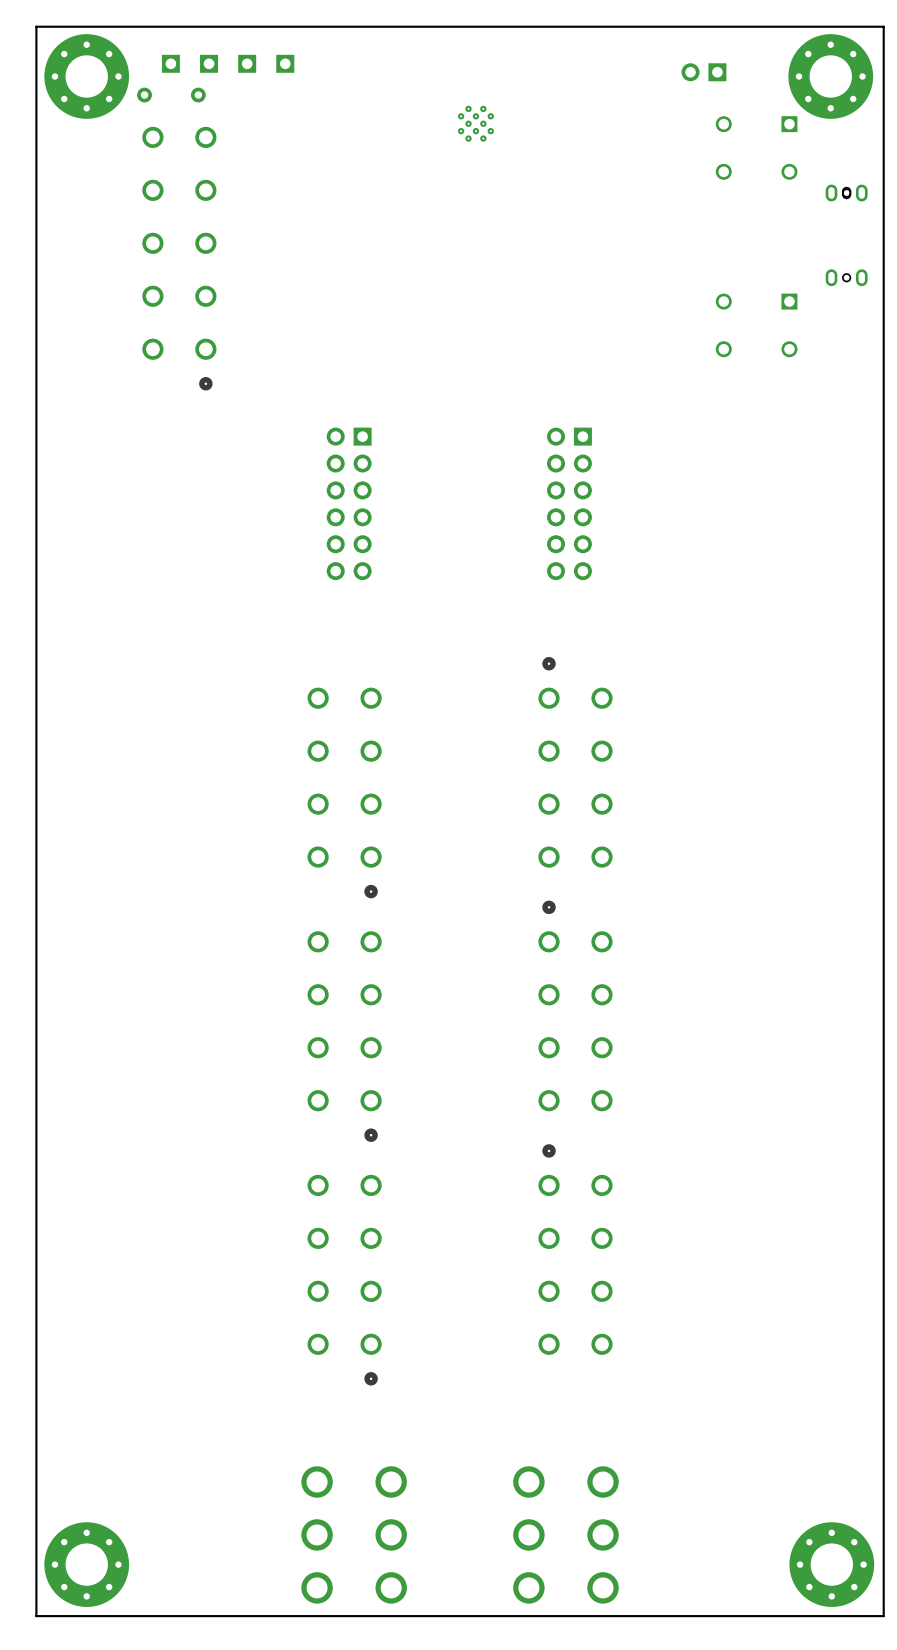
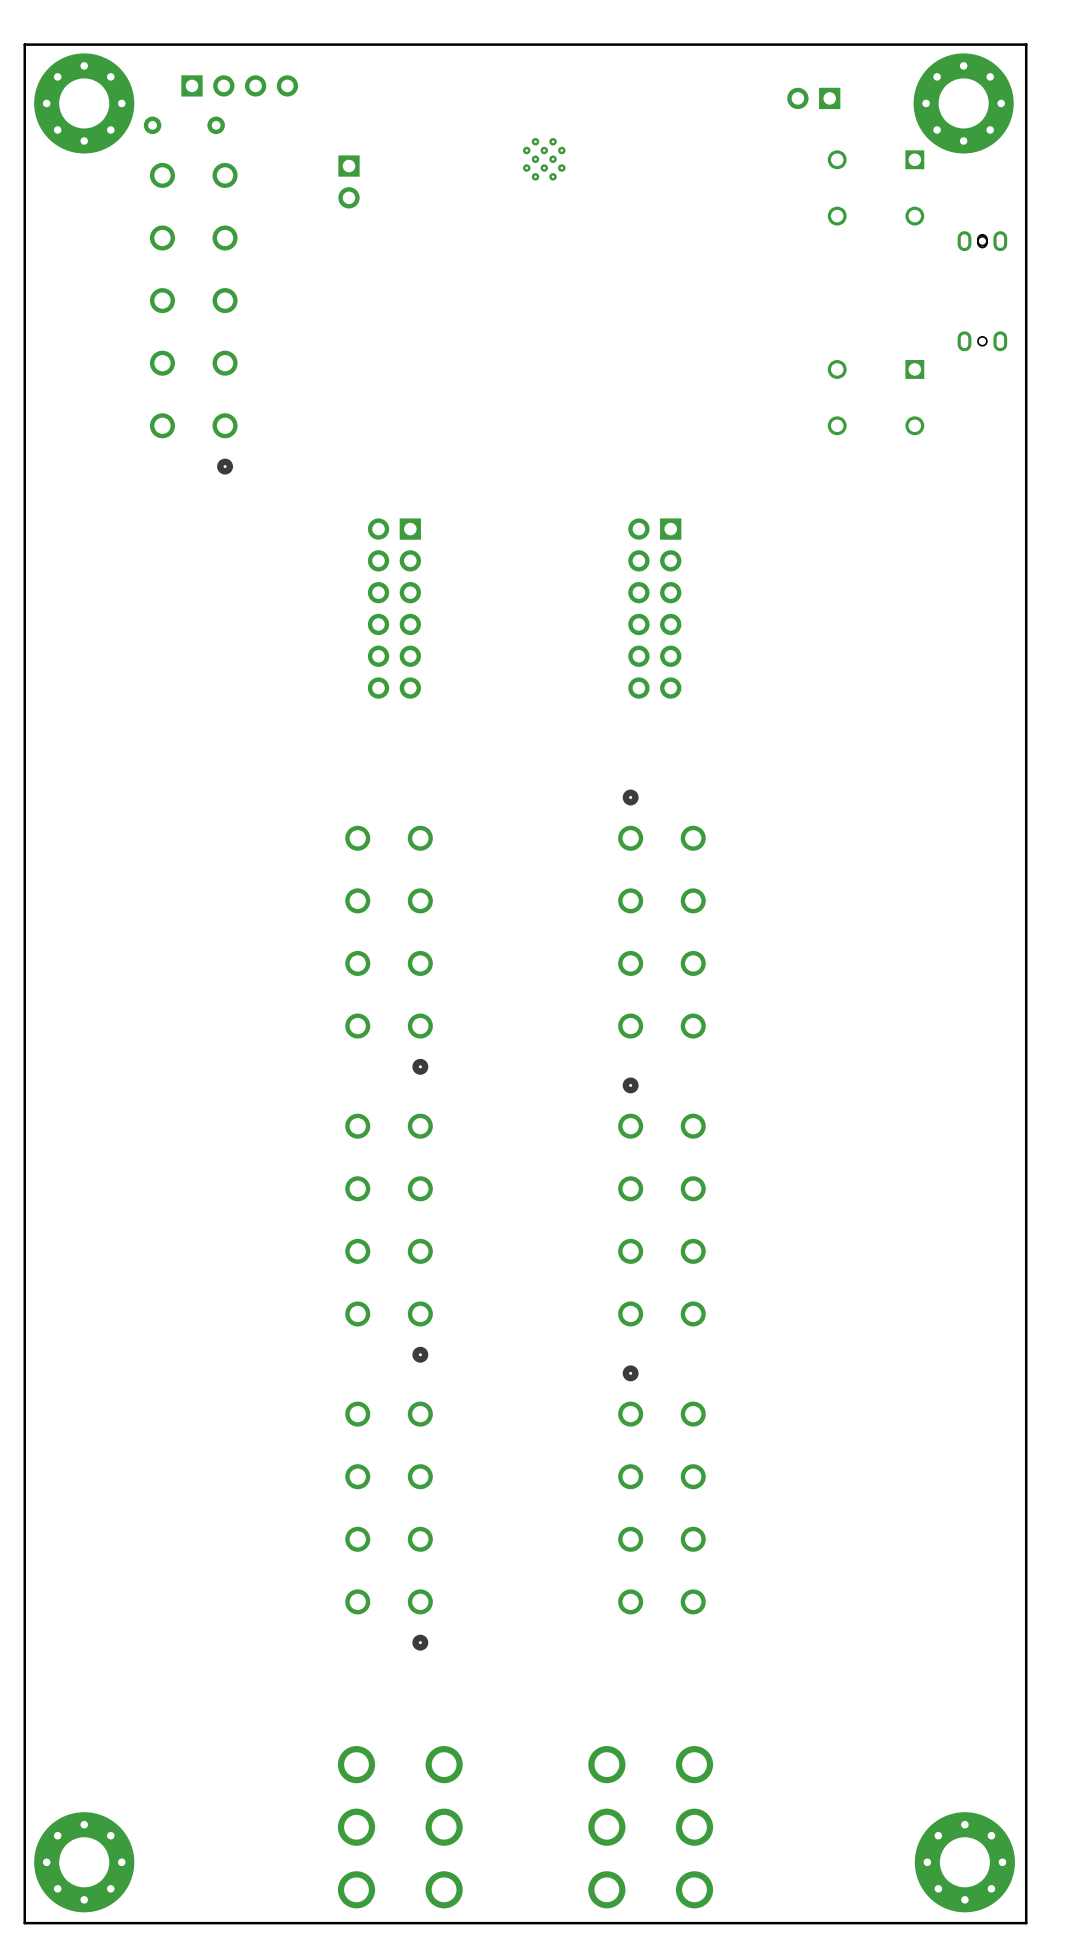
part footprint: [200, 54, 219, 73] -> [181, 75, 299, 97]
part: (170, 63) -> none
part: (247, 63) -> none
part: (285, 63) -> none
part: none -> (348, 181)

